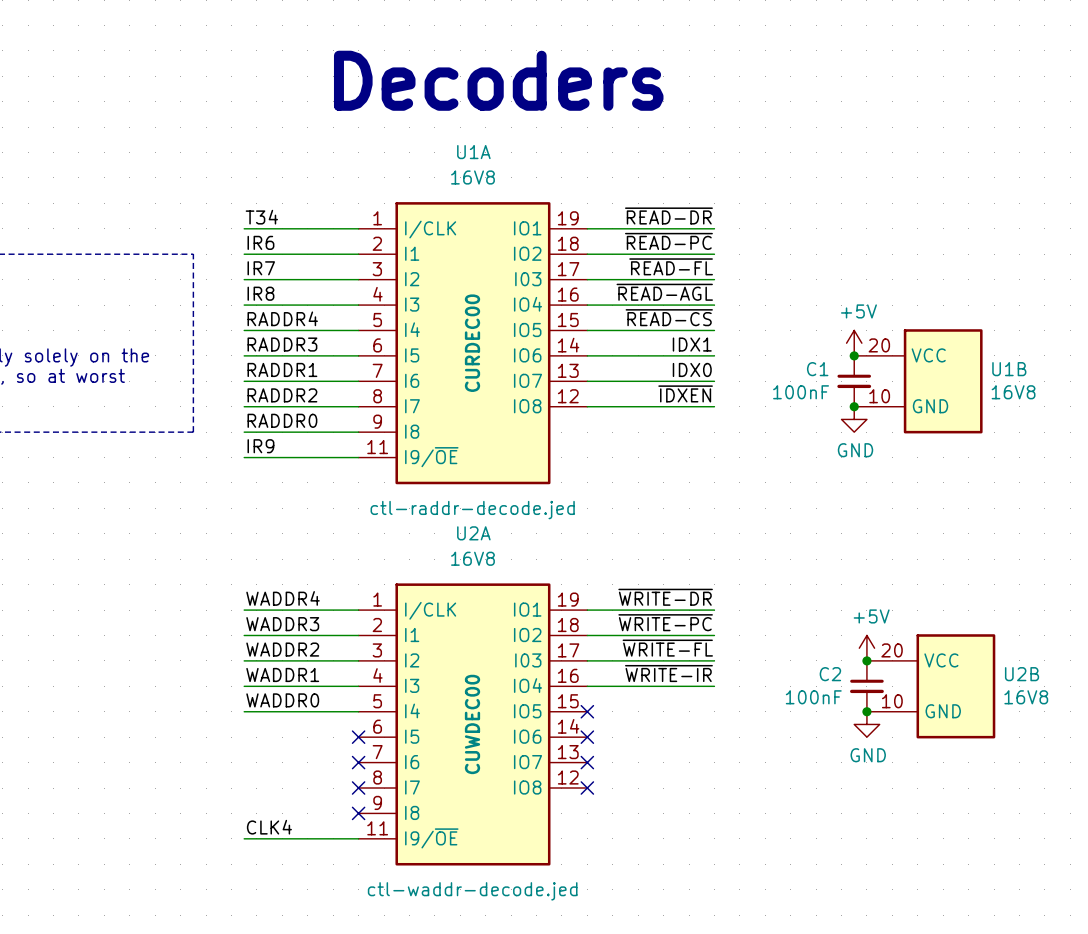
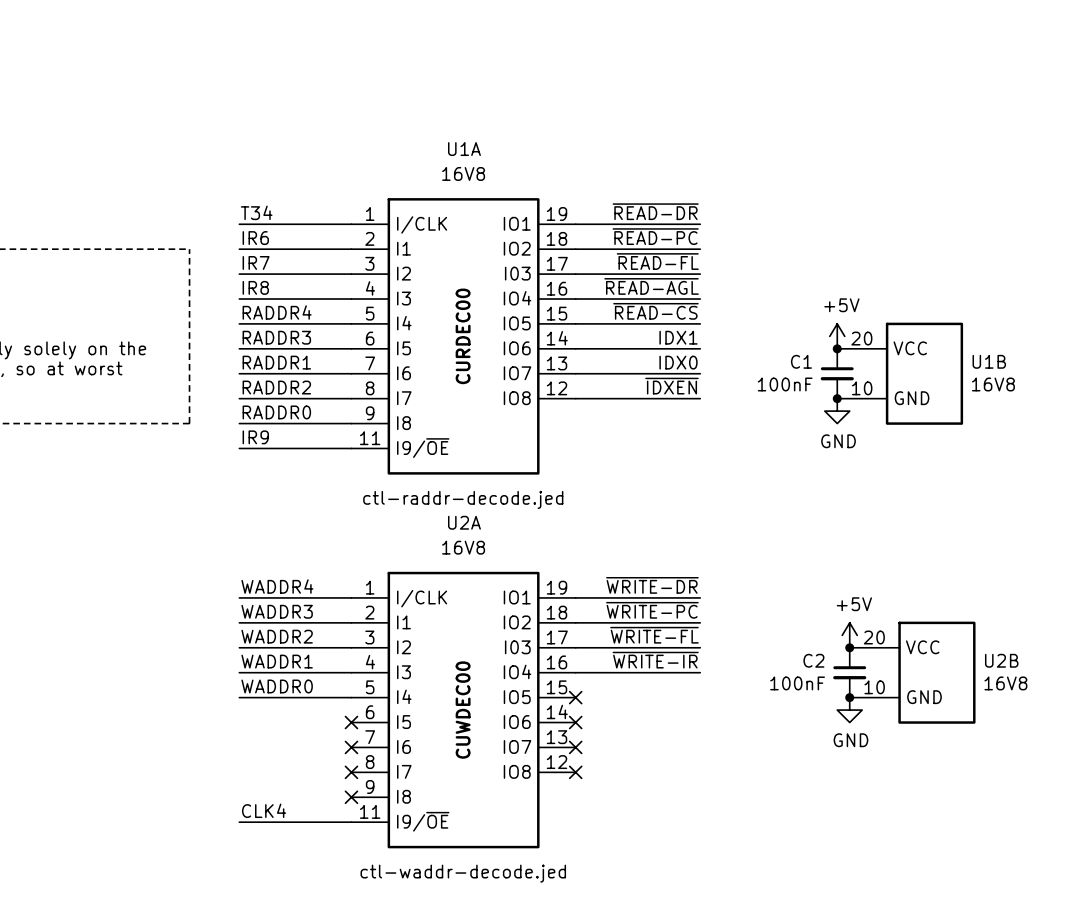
text: Decoders (498, 80) -> none

